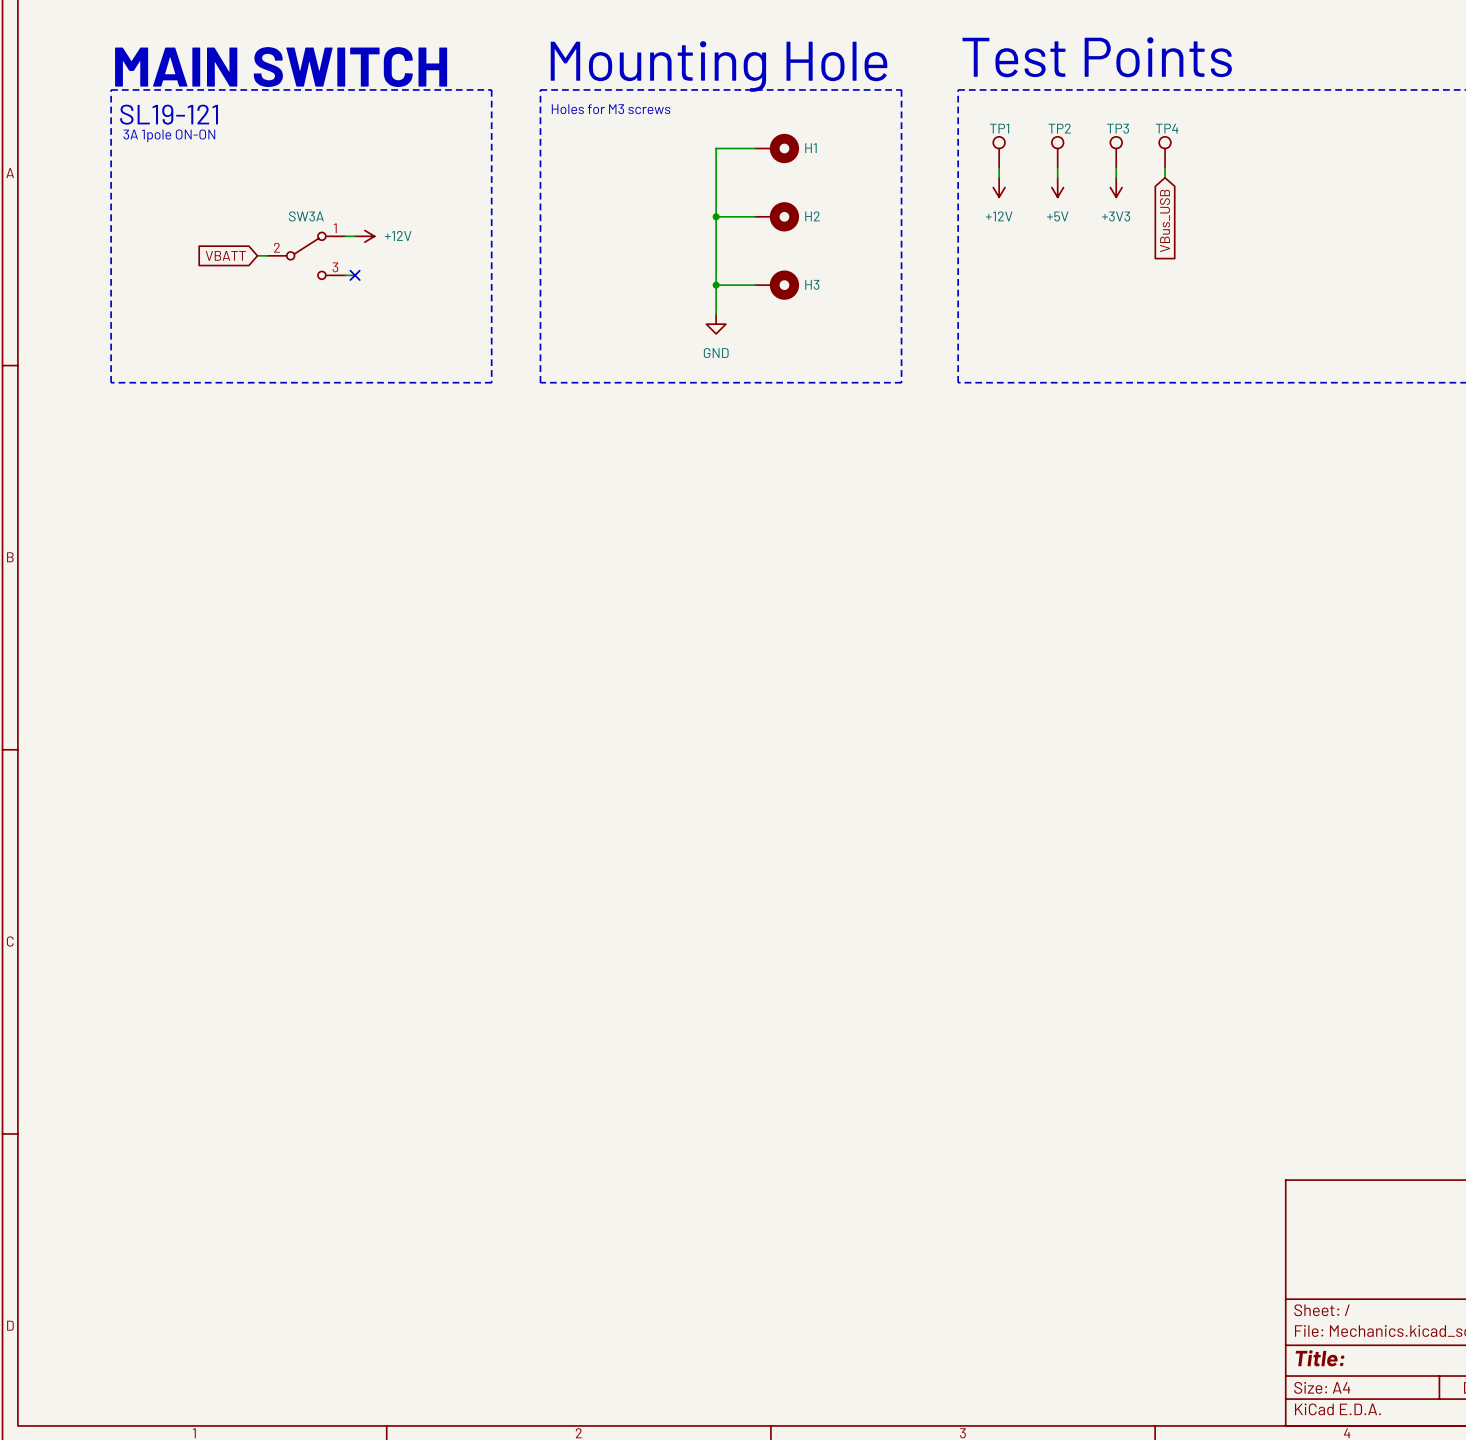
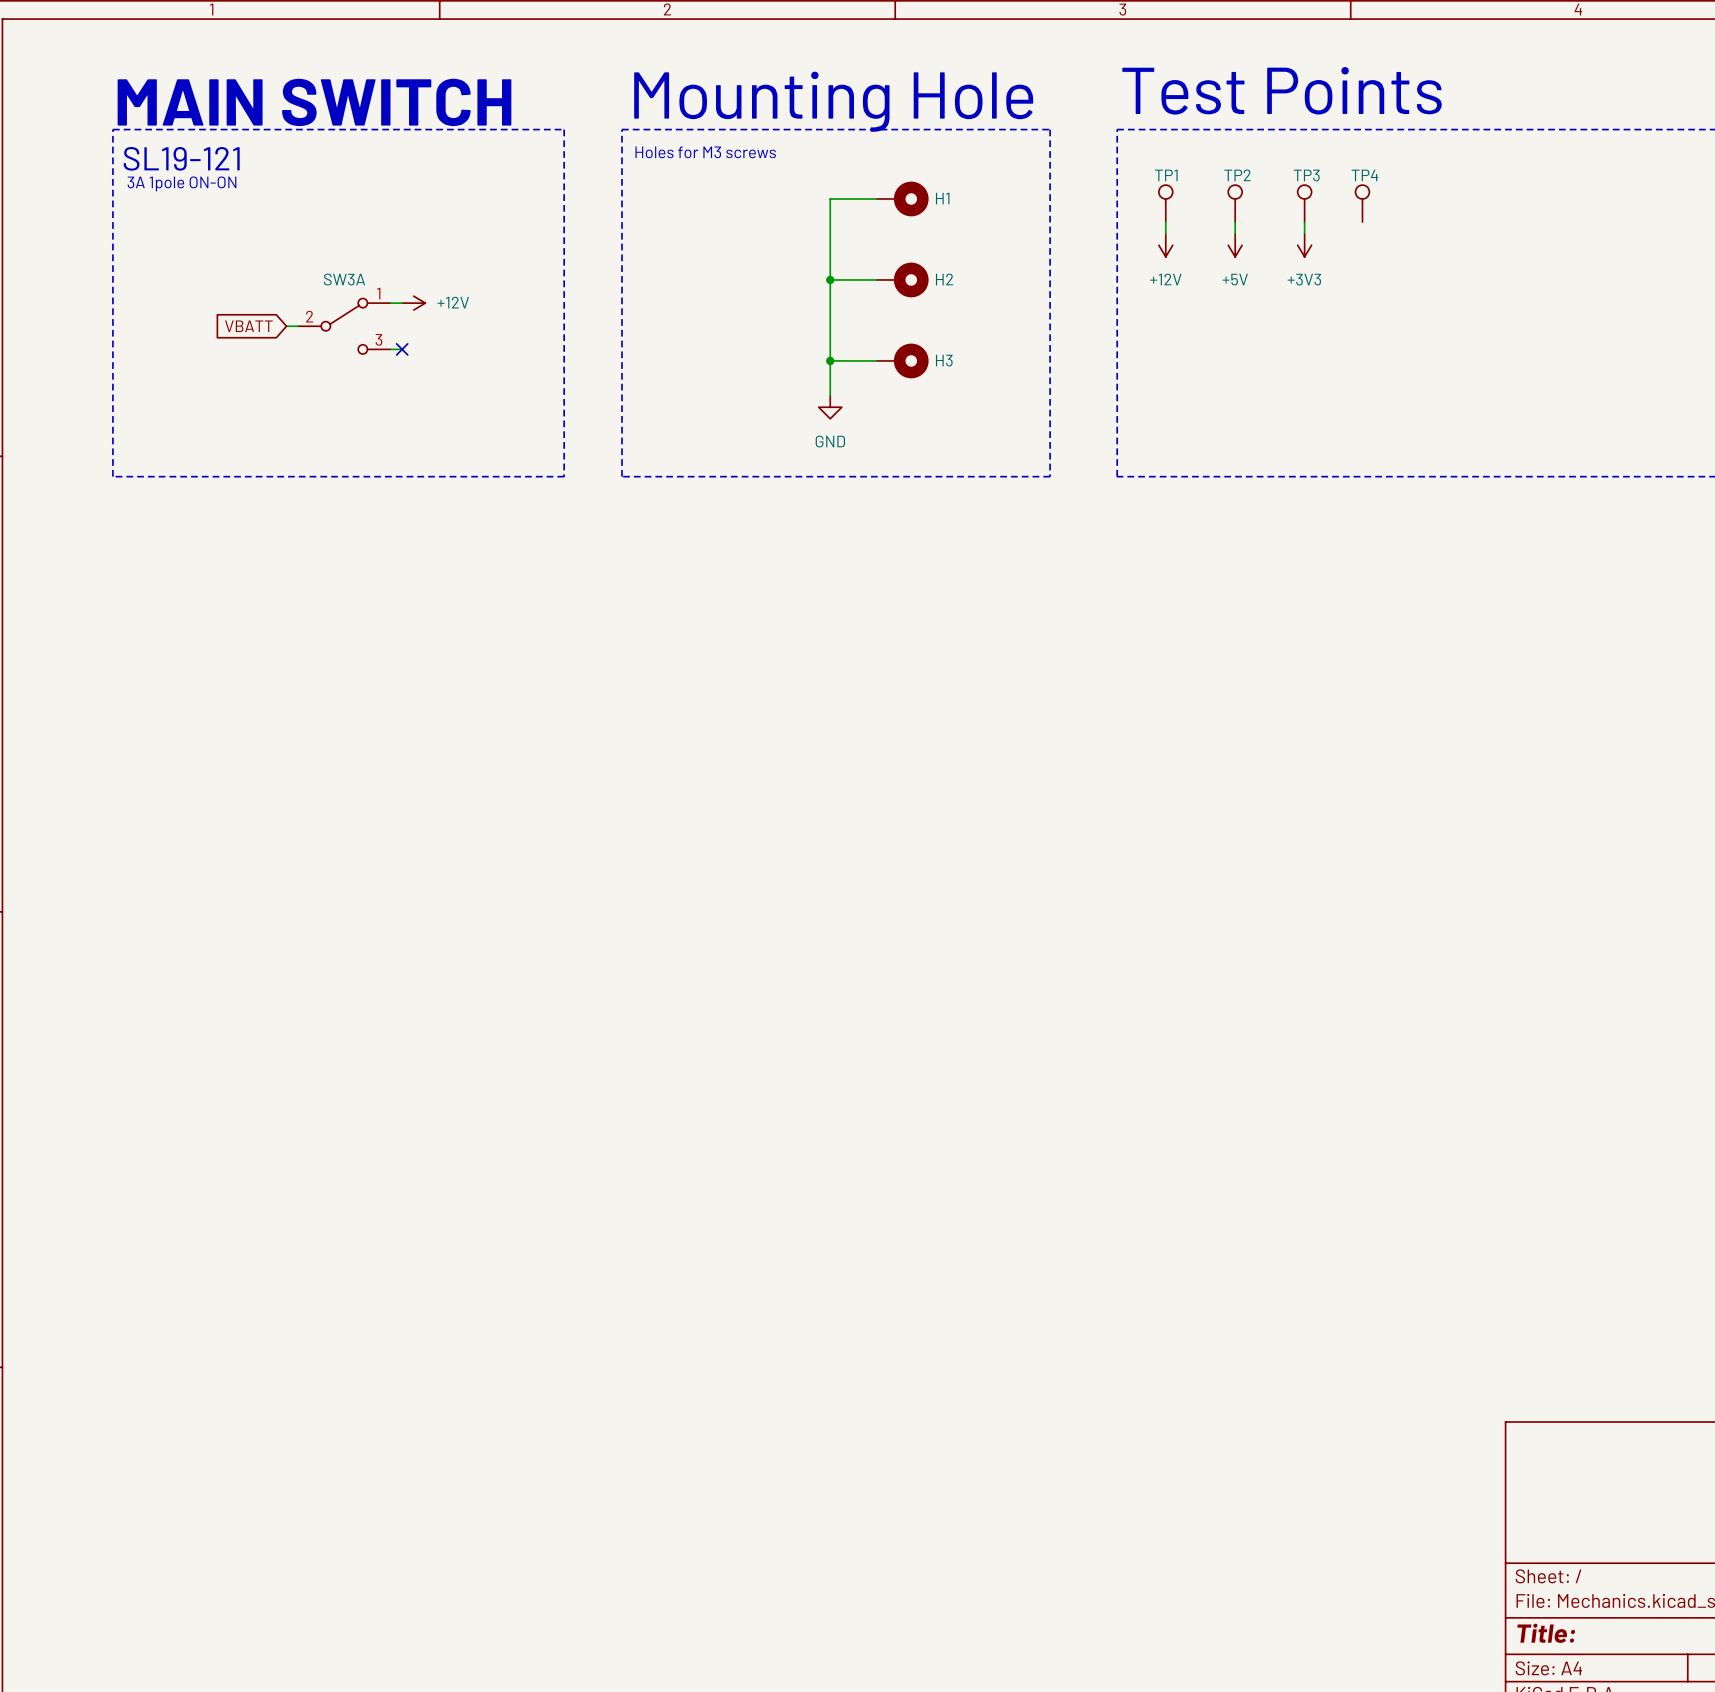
wire: (1165, 168) (1165, 177) -> none
global label: VBus_USB (1165, 220) -> none

